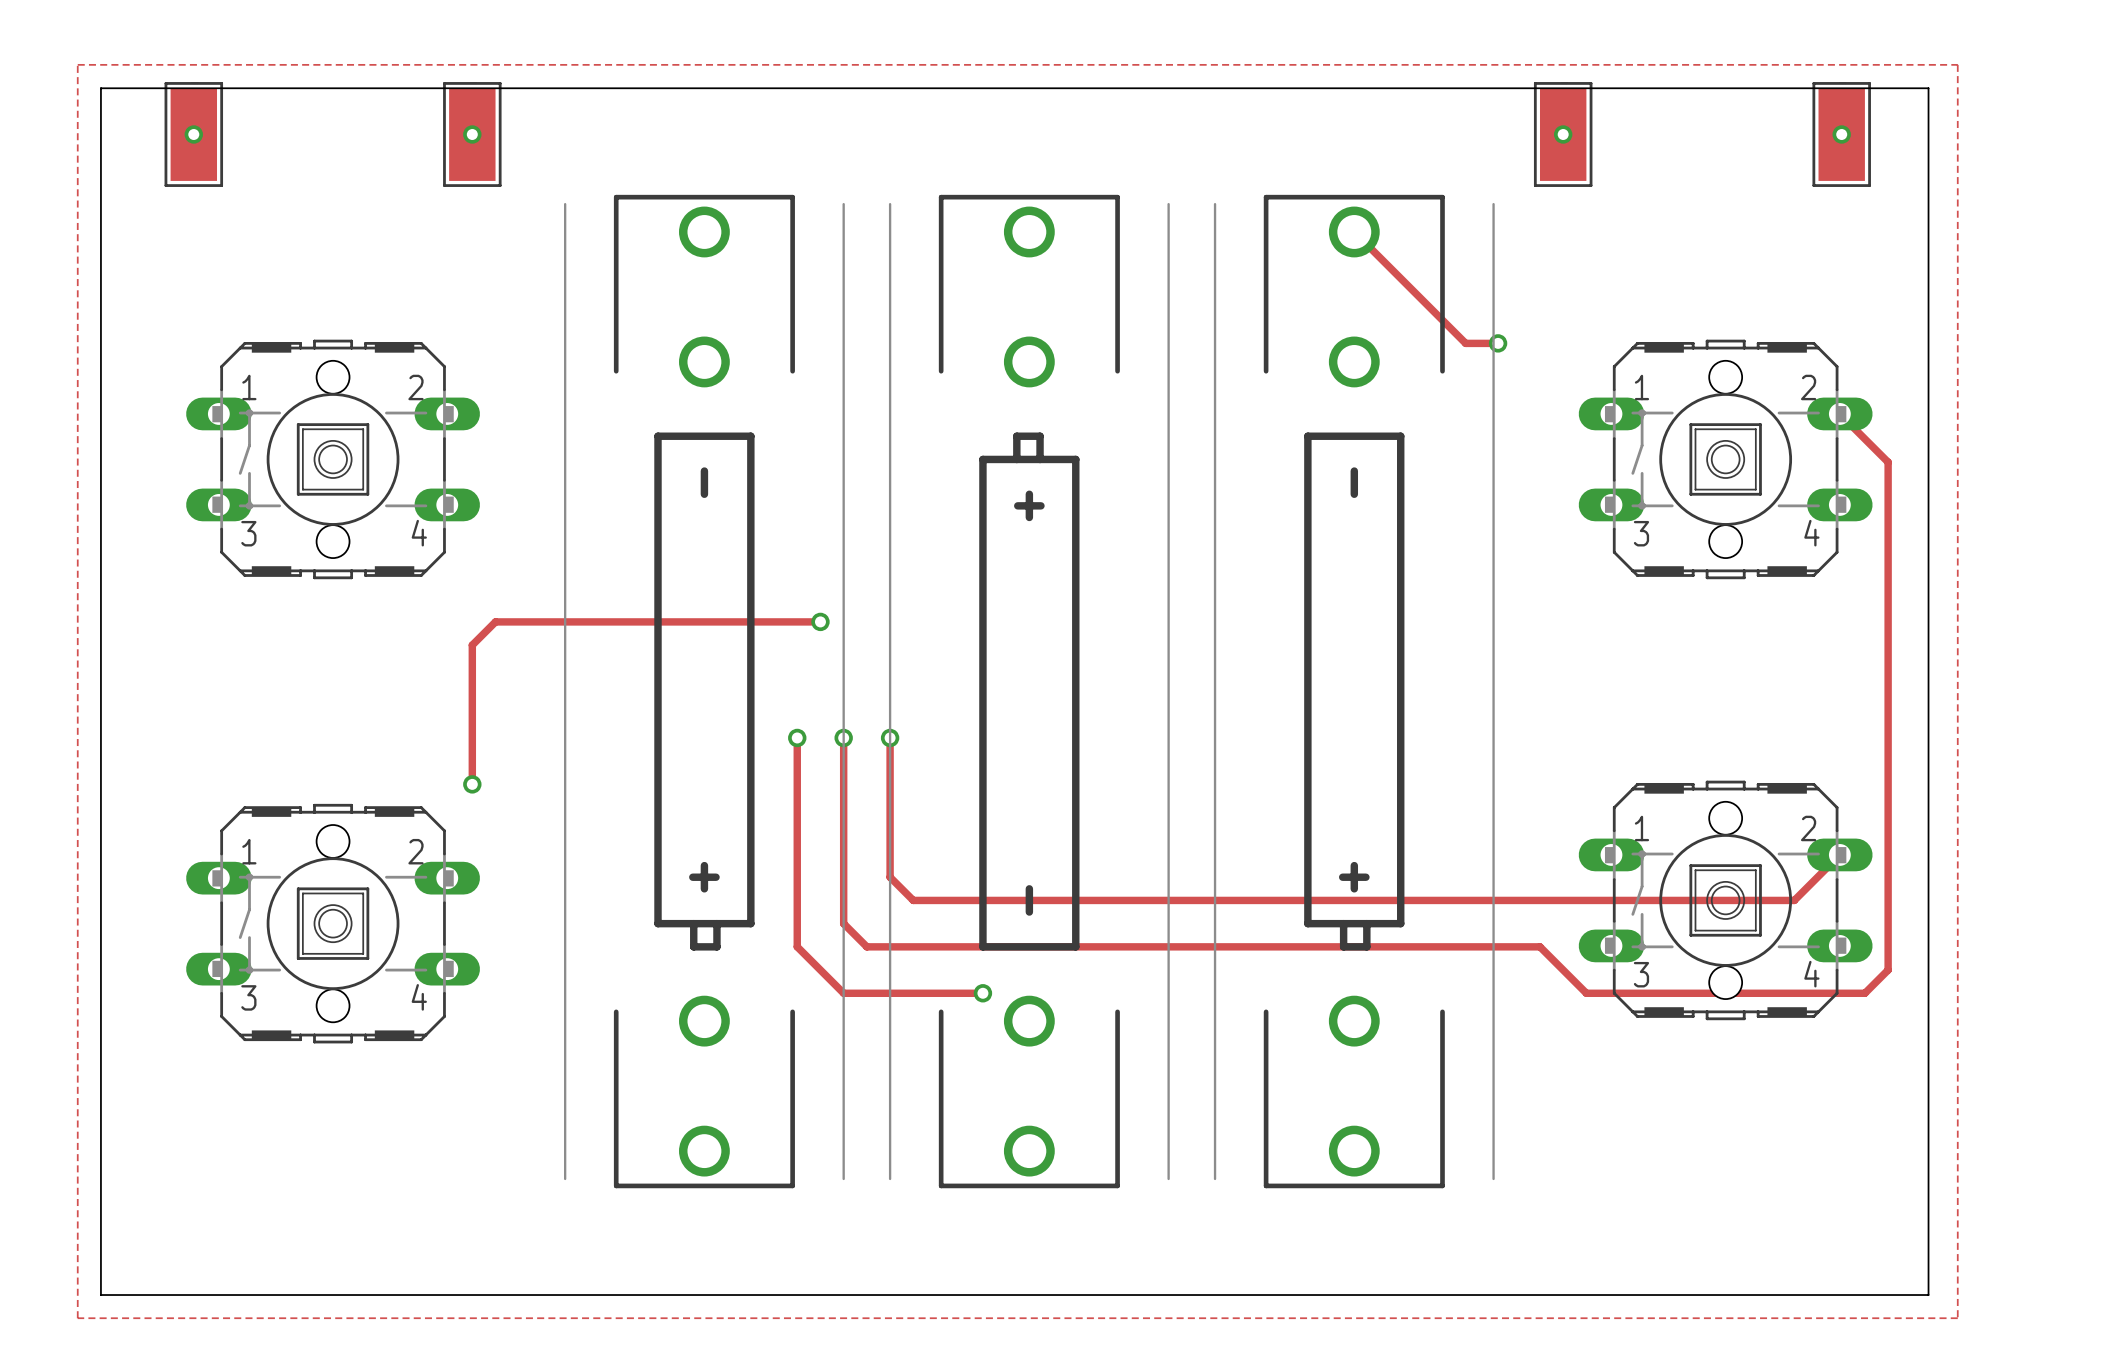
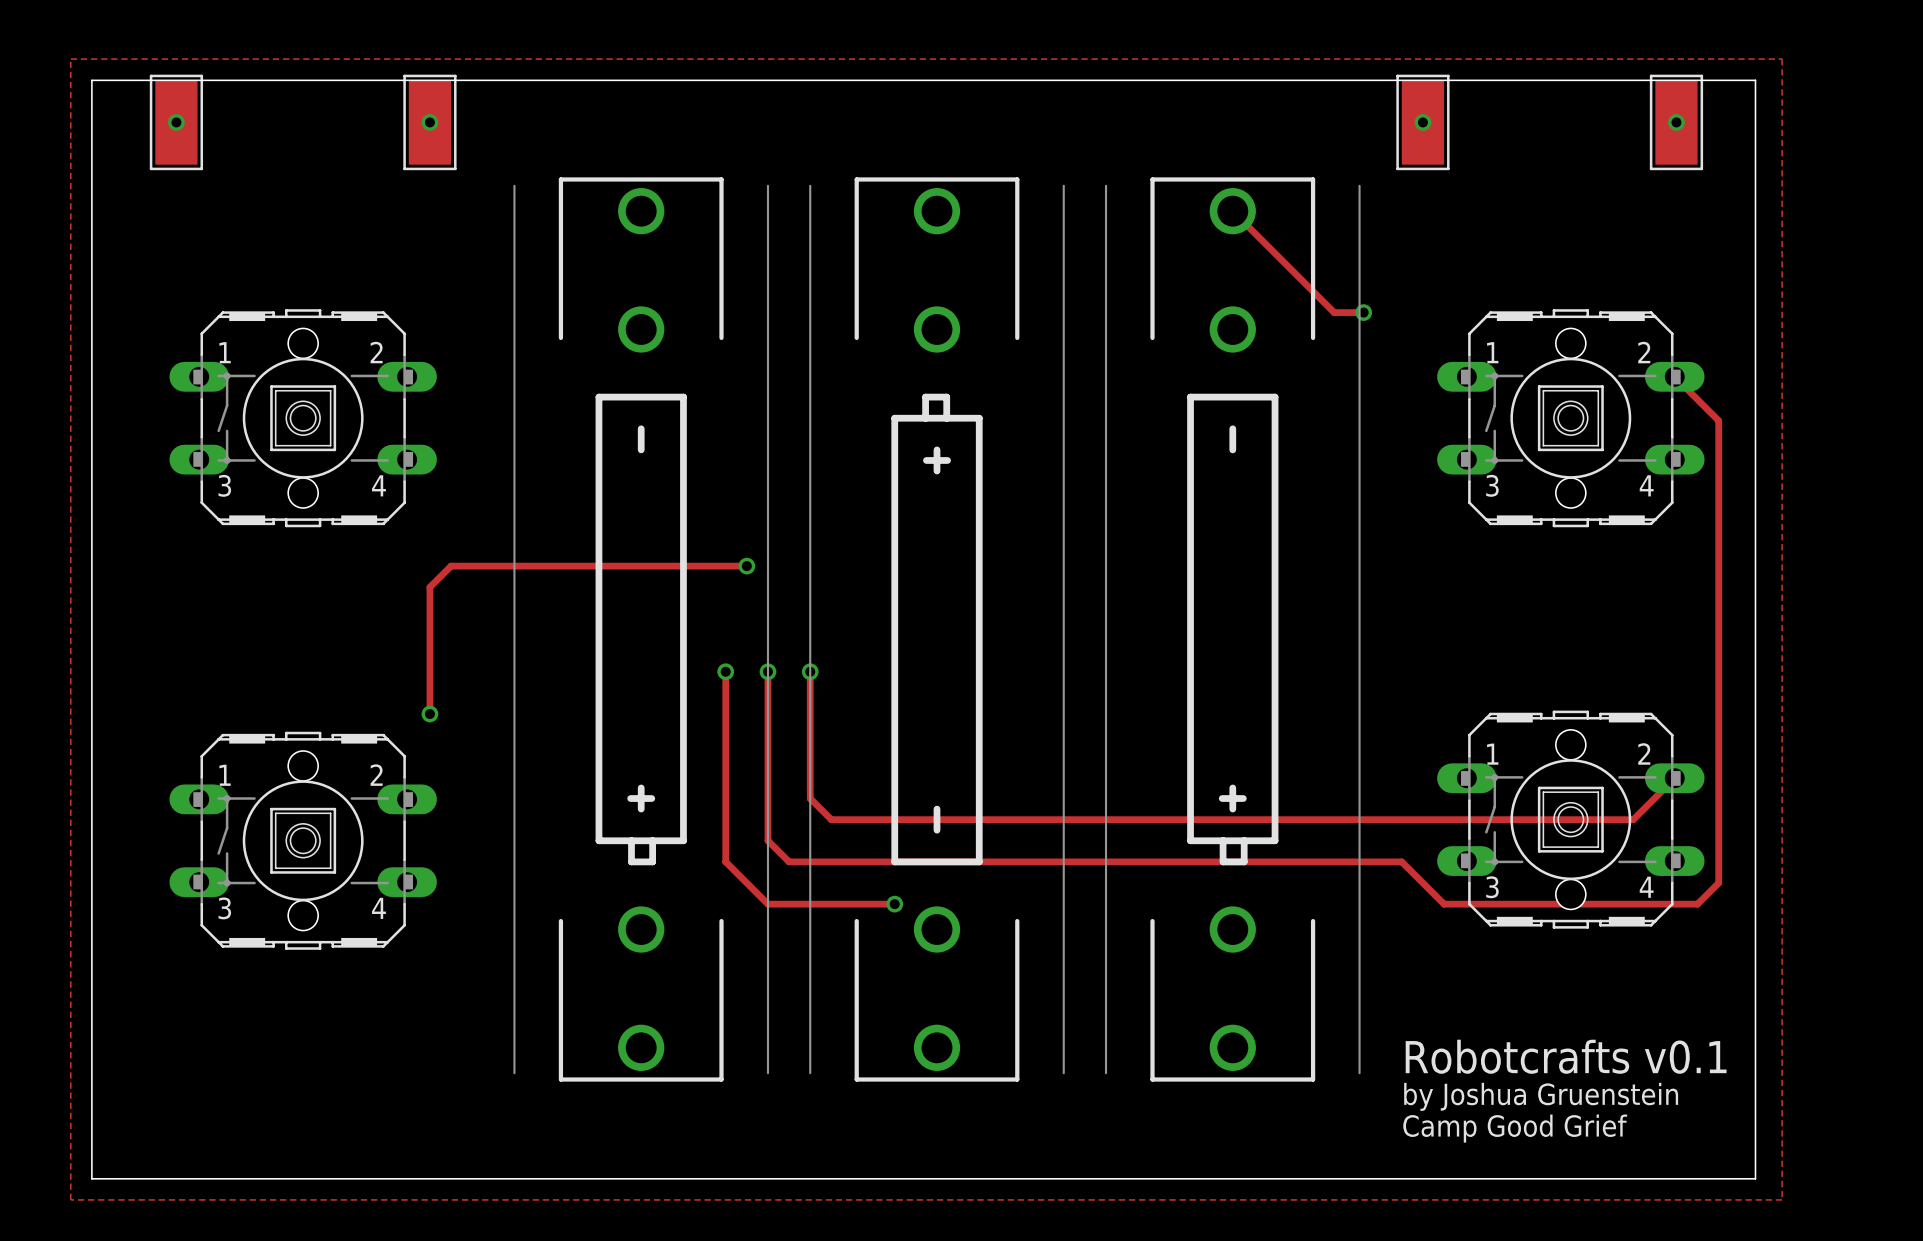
text: none -> Robotcrafts v0.1 (1566, 1056)
text: none -> by Joshua Gruenstein (1541, 1096)
text: none -> Camp Good Grief (1515, 1128)

